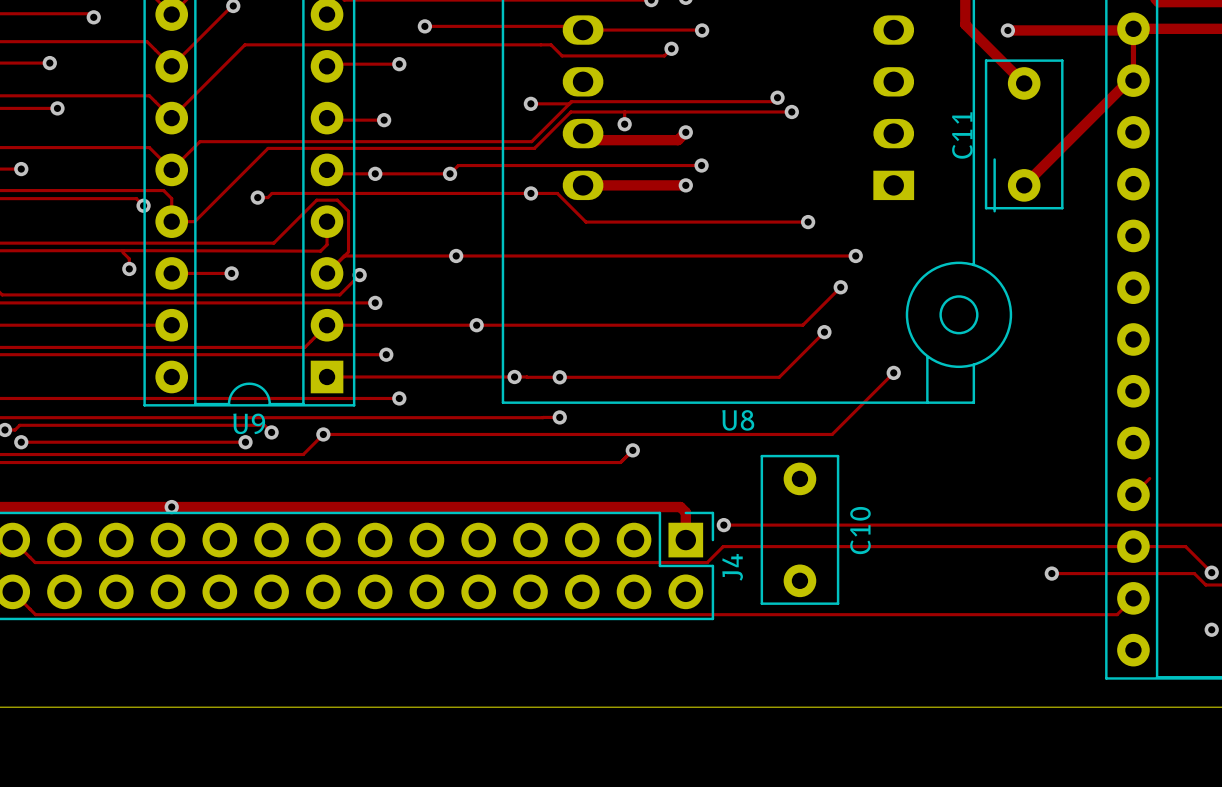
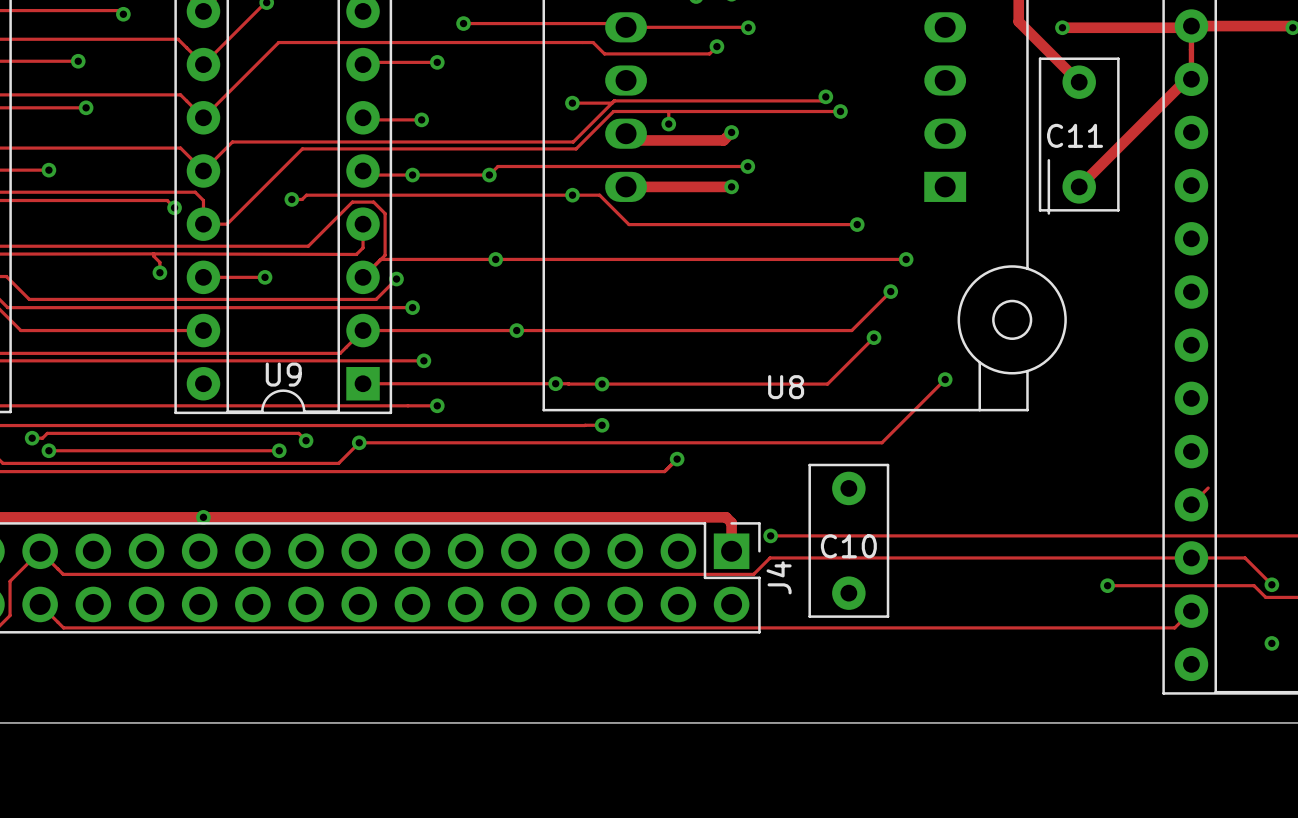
C11 name rotation: 0° (962, 135) -> 90° clockwise (1075, 135)
U8 name position: U8 (738, 420) -> U8 (786, 387)
U9 name position: U9 (249, 423) -> U9 (283, 374)
C10 name rotation: 0° (860, 530) -> 90° clockwise (848, 546)

